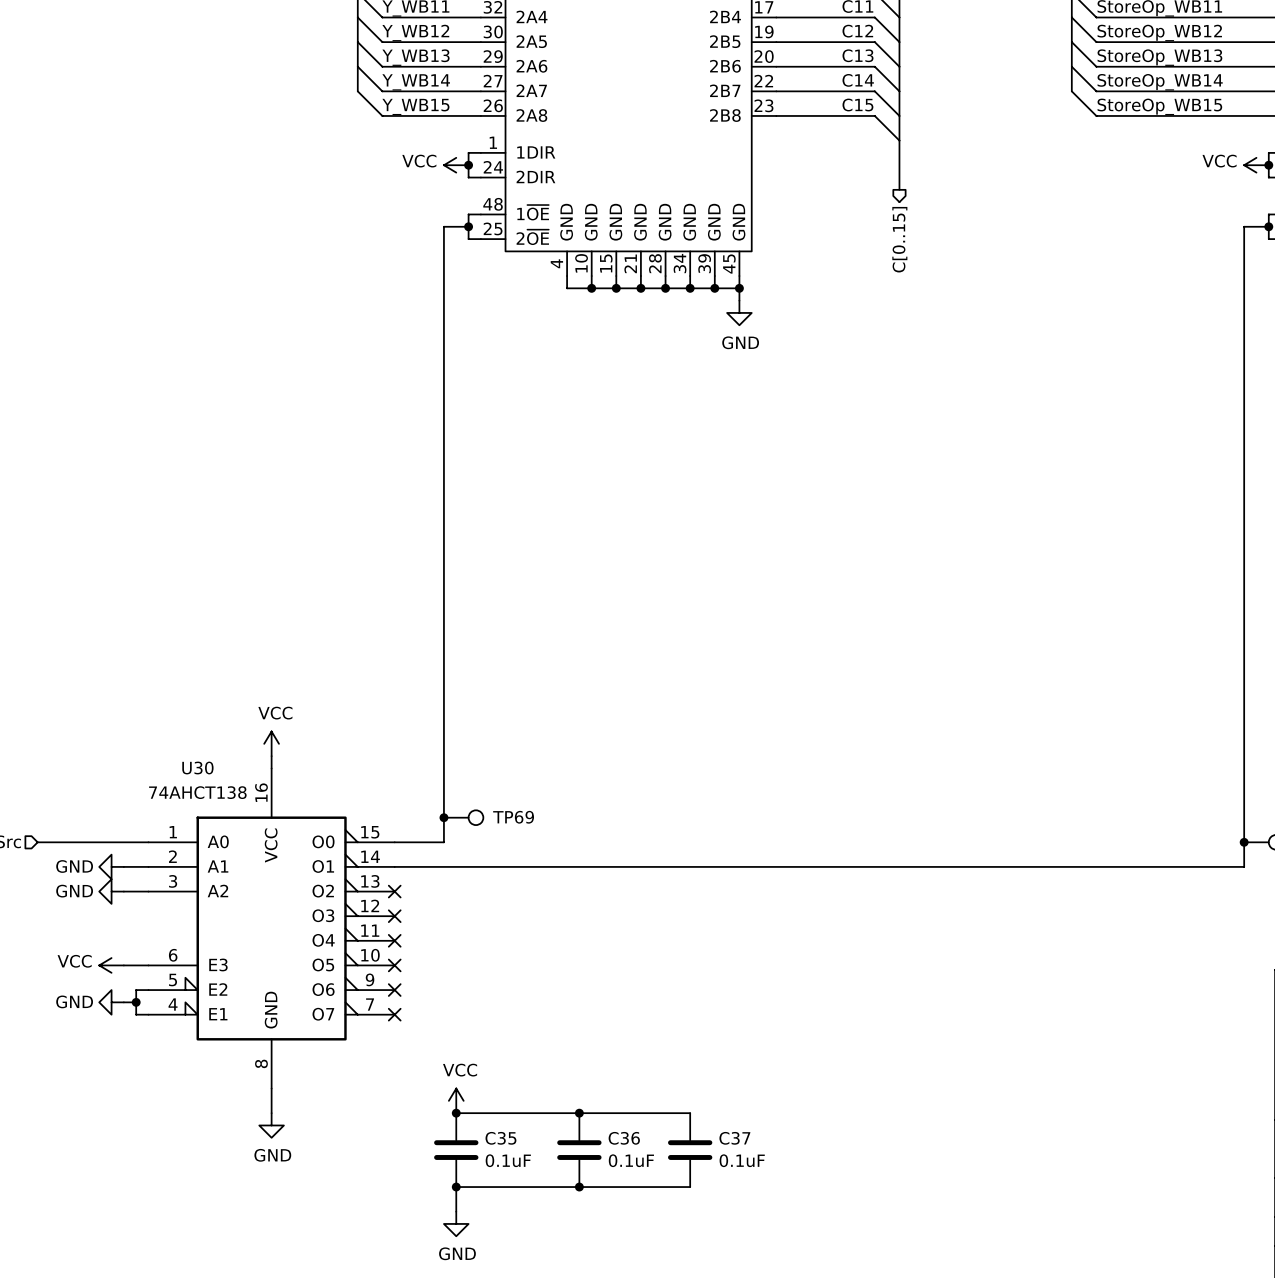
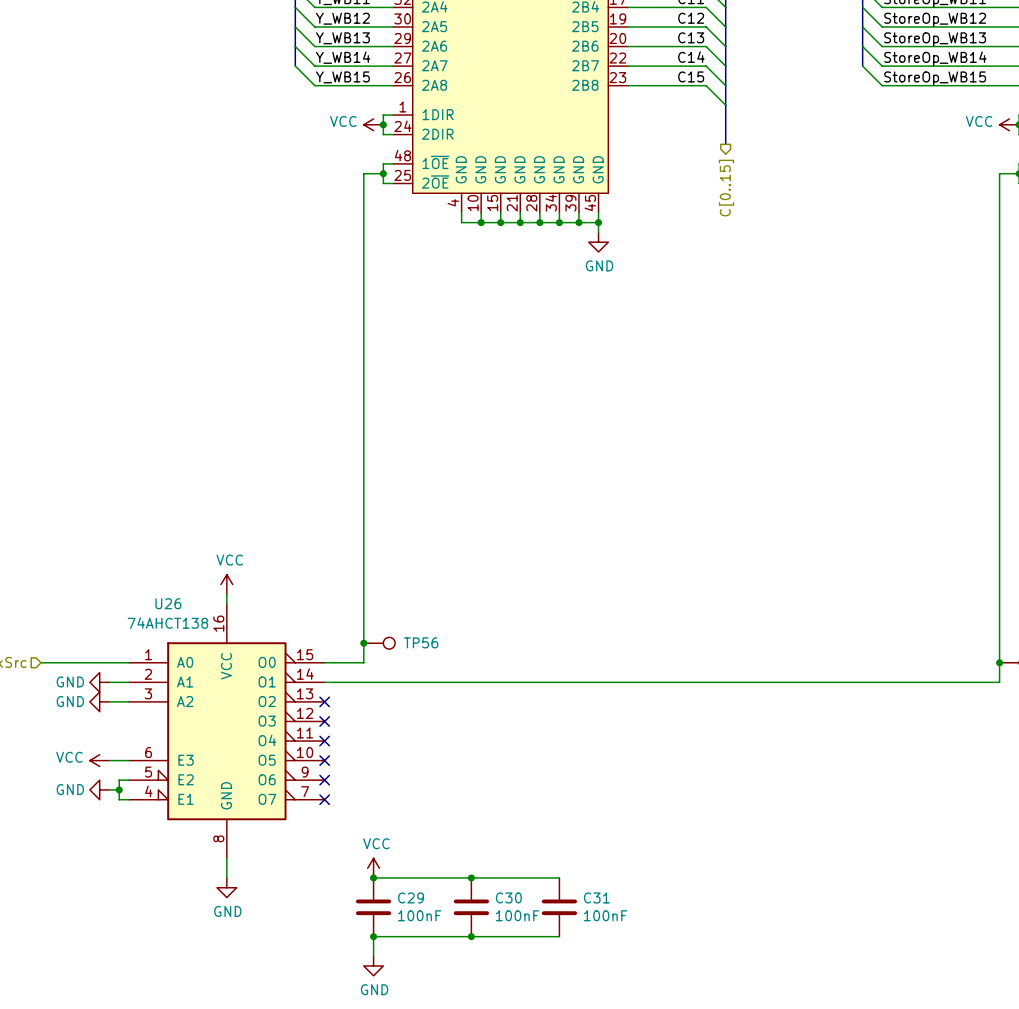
U30 name: U30 (197, 768) -> U26 (168, 603)
TP69 name: TP69 (513, 817) -> TP56 (421, 642)
C35 name: C35 (500, 1138) -> C29 (411, 897)
C36 name: C36 (624, 1138) -> C30 (508, 897)
C37 name: C37 (734, 1138) -> C31 (596, 897)
C35 value: 0.1uF (508, 1160) -> 100nF (419, 915)
C36 value: 0.1uF (631, 1160) -> 100nF (517, 915)
C37 value: 0.1uF (742, 1160) -> 100nF (605, 915)

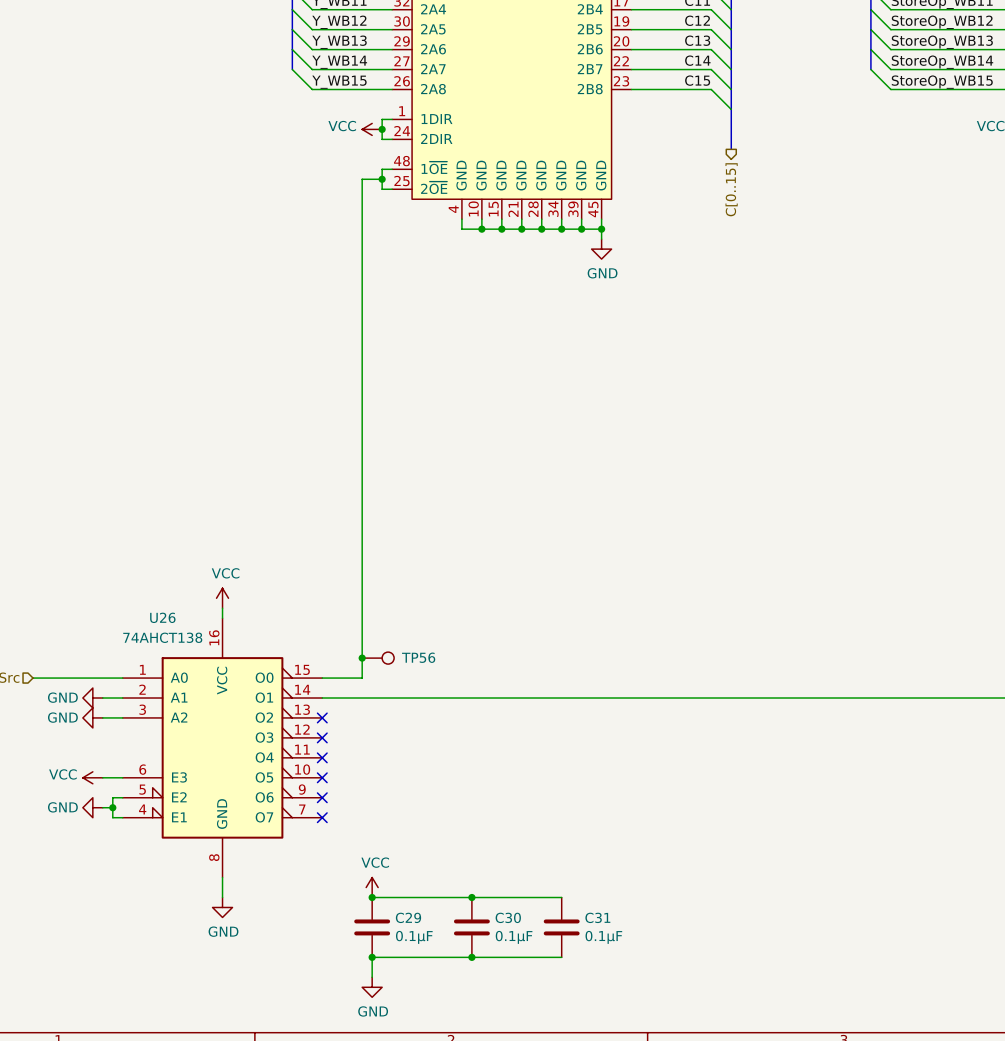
C29 value: 100nF (419, 915) -> 0.1µF (414, 937)
C30 value: 100nF (517, 915) -> 0.1µF (514, 937)
C31 value: 100nF (605, 915) -> 0.1µF (603, 937)

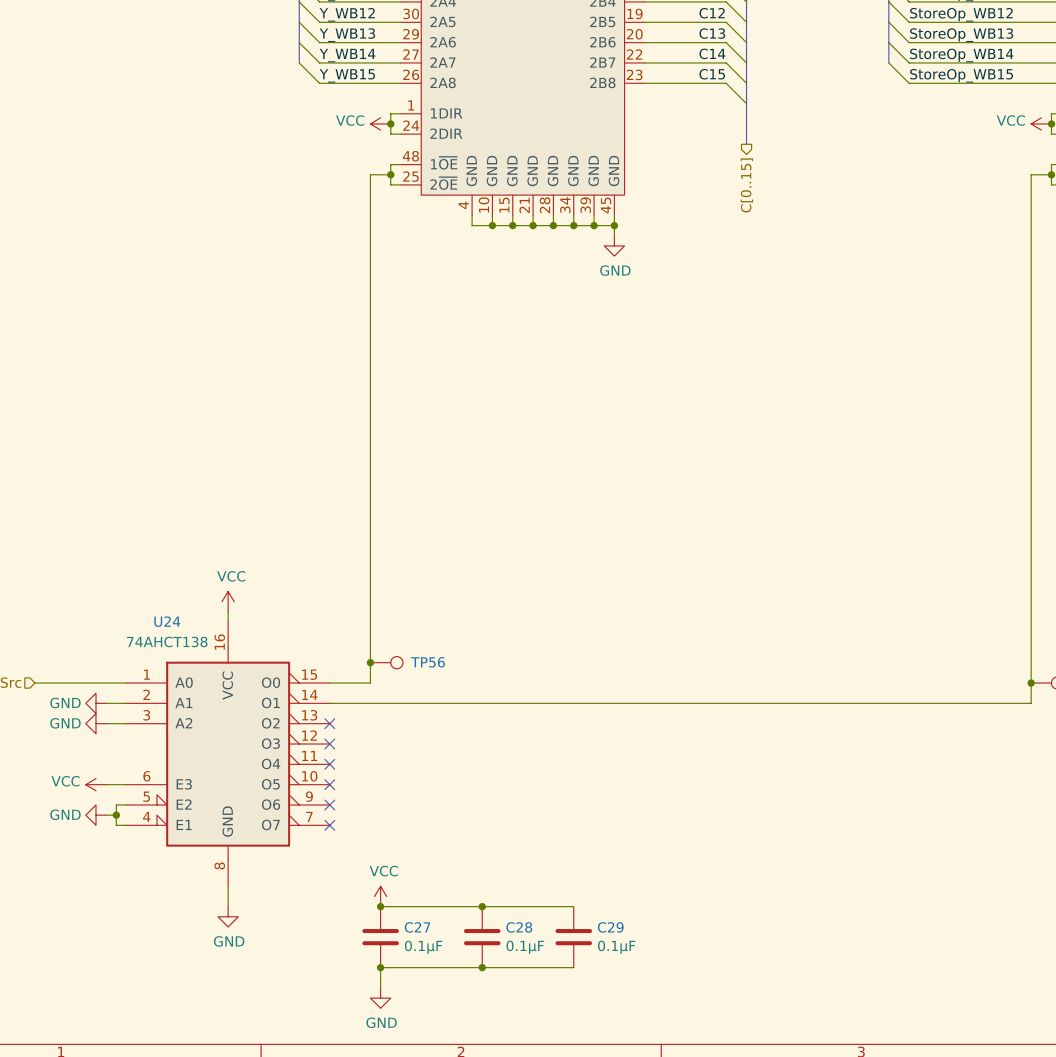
U26 name: U26 (162, 617) -> U24 (167, 621)
C29 name: C29 (408, 917) -> C27 (417, 927)
C30 name: C30 (508, 917) -> C28 (519, 927)
C31 name: C31 (597, 917) -> C29 (610, 927)

